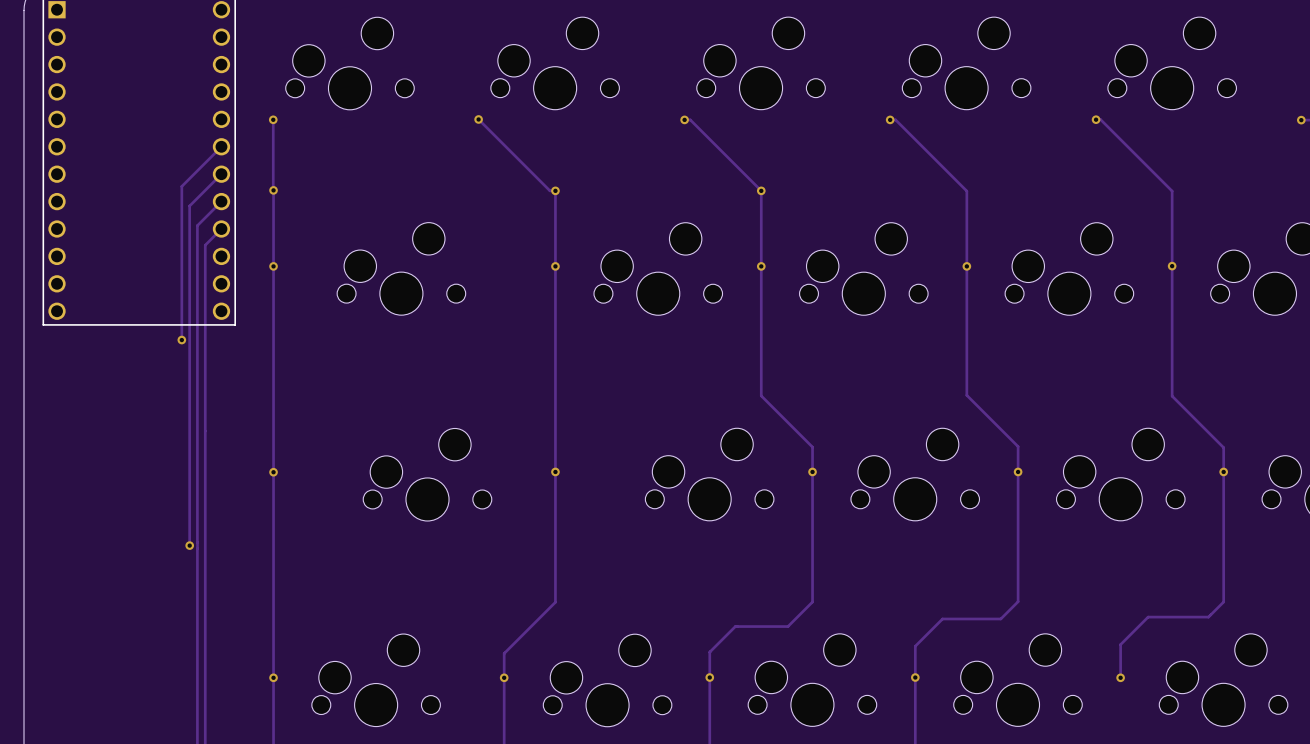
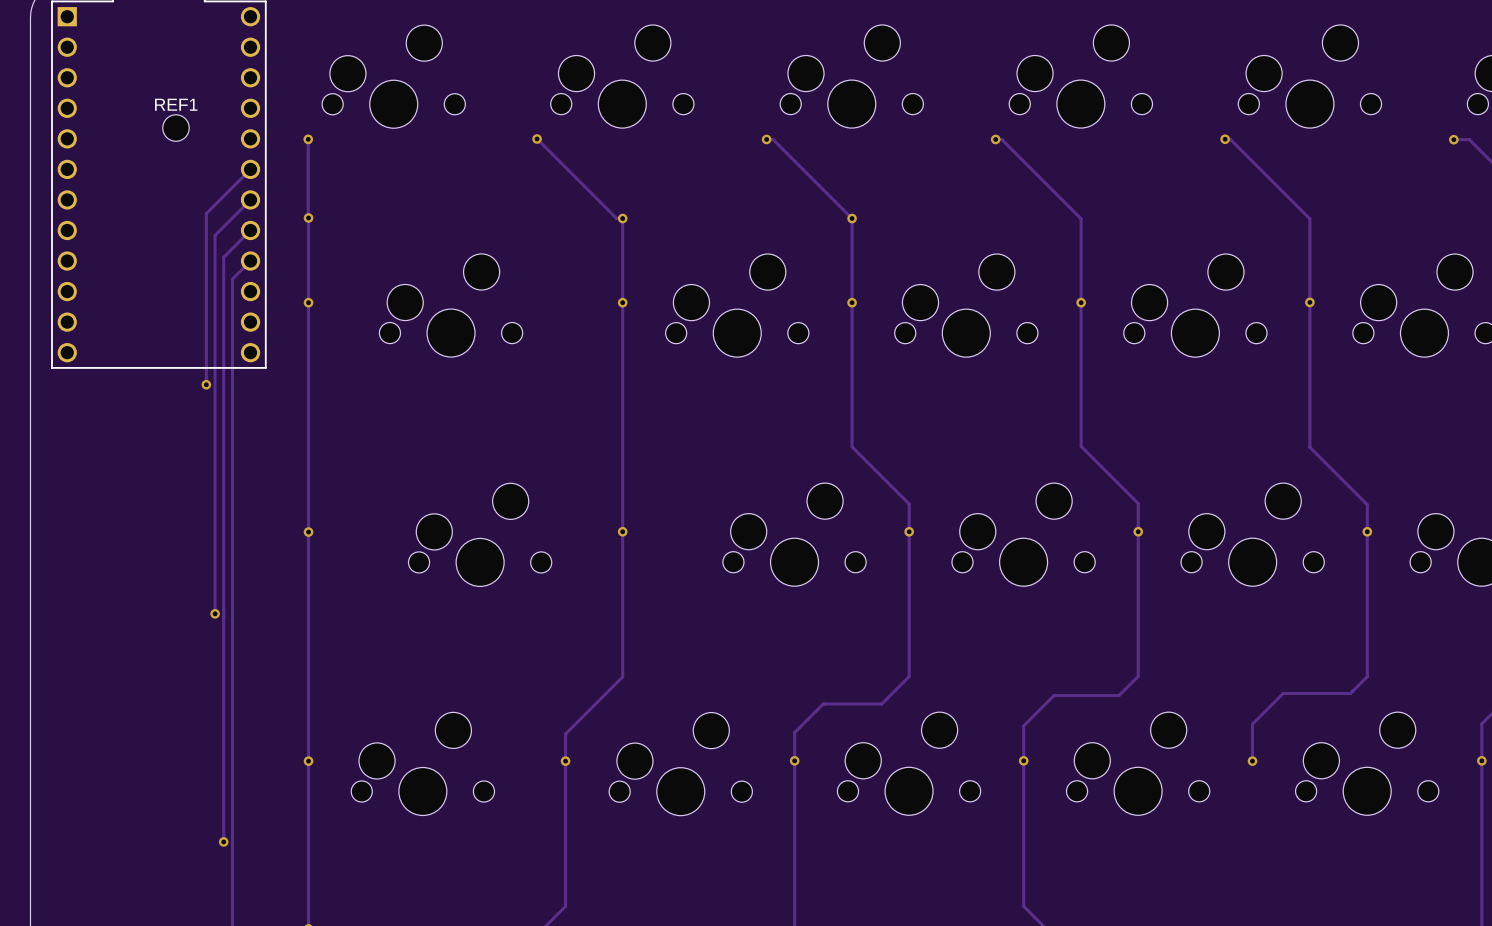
REF1: none -> (175, 128)

